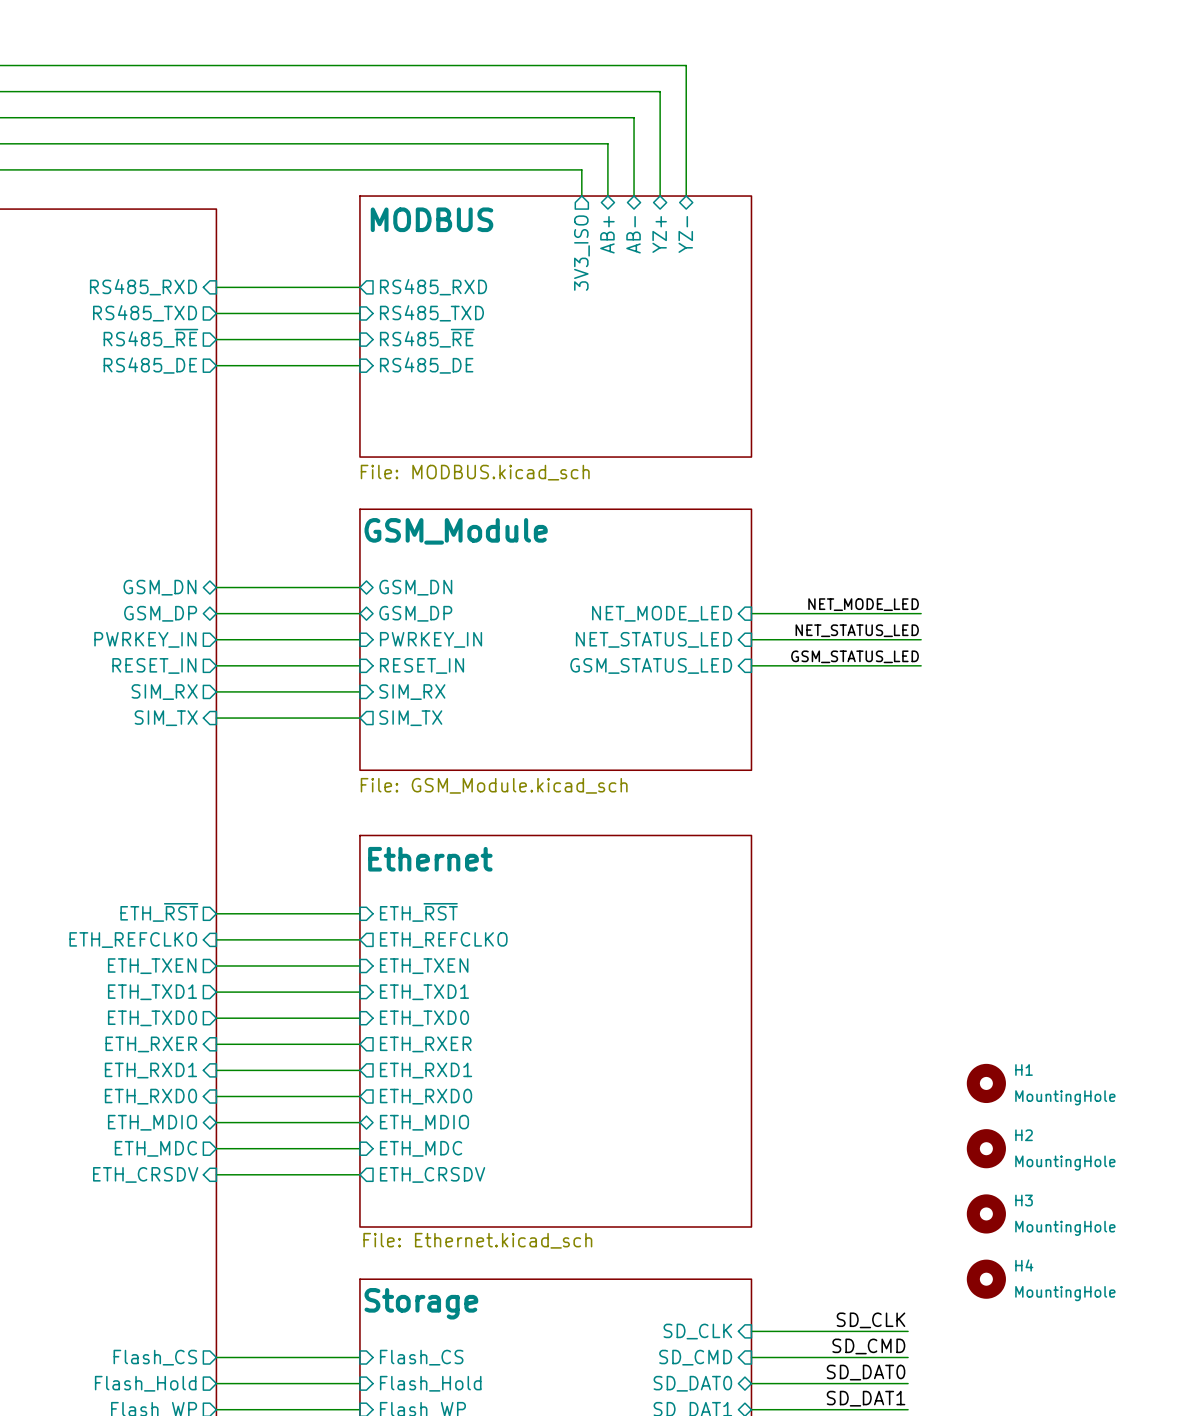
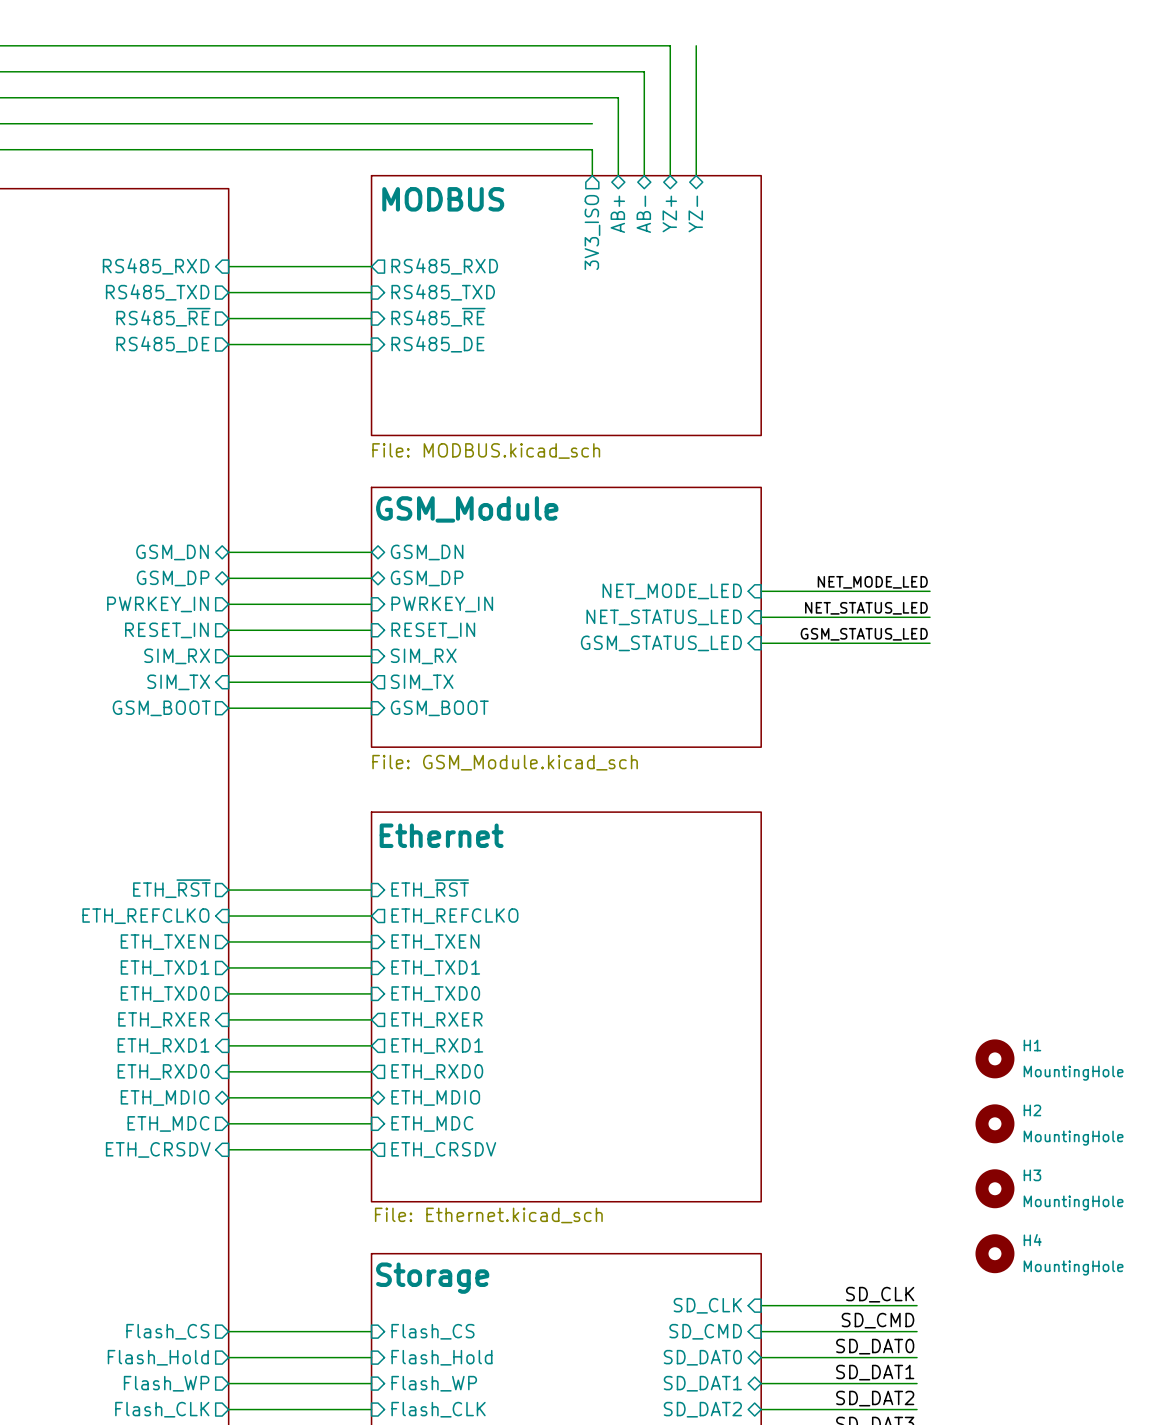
wire: (660, 65) (686, 65) -> (670, 45) (670, 71)
wire: (634, 91) (660, 91) -> none
wire: (607, 117) (634, 117) -> (644, 71) (644, 97)
wire: (581, 143) (607, 143) -> (618, 97) (618, 123)
sheet pin position: GSM_DN (159, 587) -> GSM_DN (172, 552)
wire: (216, 587) (359, 587) -> (228, 552) (371, 552)
sheet pin position: GSM_DN (415, 587) -> GSM_DN (427, 552)
sheet pin position: GSM_DP (160, 613) -> GSM_DP (173, 578)
wire: (216, 613) (359, 613) -> (228, 604) (371, 604)
sheet pin position: GSM_DP (415, 613) -> GSM_DP (427, 578)
sheet pin position: PWRKEY_IN (145, 639) -> PWRKEY_IN (157, 604)
wire: (216, 639) (359, 639) -> (228, 578) (371, 578)
sheet pin position: PWRKEY_IN (431, 639) -> PWRKEY_IN (442, 604)
sheet pin position: RESET_IN (154, 665) -> RESET_IN (166, 630)
wire: (216, 665) (359, 665) -> (228, 630) (371, 630)
sheet pin position: RESET_IN (422, 665) -> RESET_IN (433, 630)
wire: (216, 691) (359, 691) -> (228, 656) (371, 656)
sheet pin position: SIM_RX (164, 692) -> SIM_RX (177, 656)
sheet pin position: SIM_RX (412, 692) -> SIM_RX (423, 656)
sheet pin position: SIM_TX (166, 718) -> SIM_TX (178, 682)
wire: (216, 718) (359, 718) -> (228, 682) (371, 682)
sheet pin position: SIM_TX (410, 718) -> SIM_TX (422, 682)
sheet pin: none -> GSM_BOOT (161, 708)
wire: none -> (228, 708) (371, 708)
sheet pin: none -> GSM_BOOT (439, 708)

